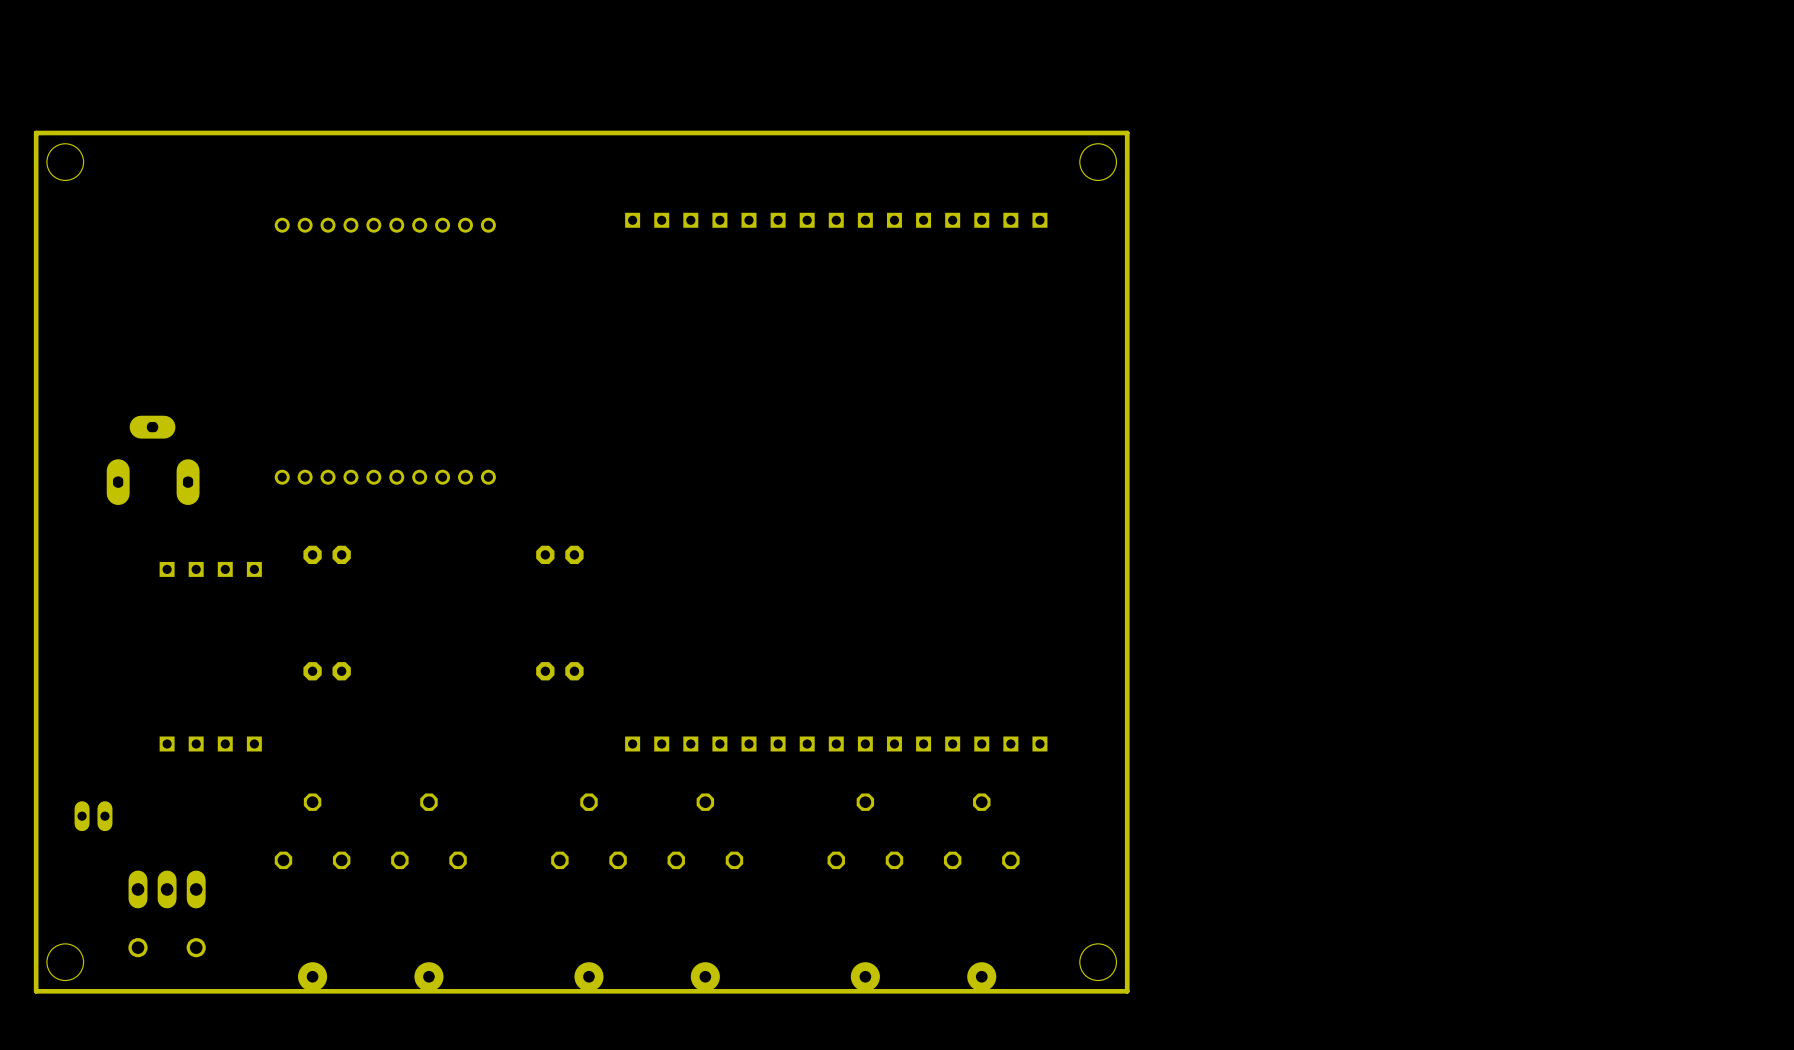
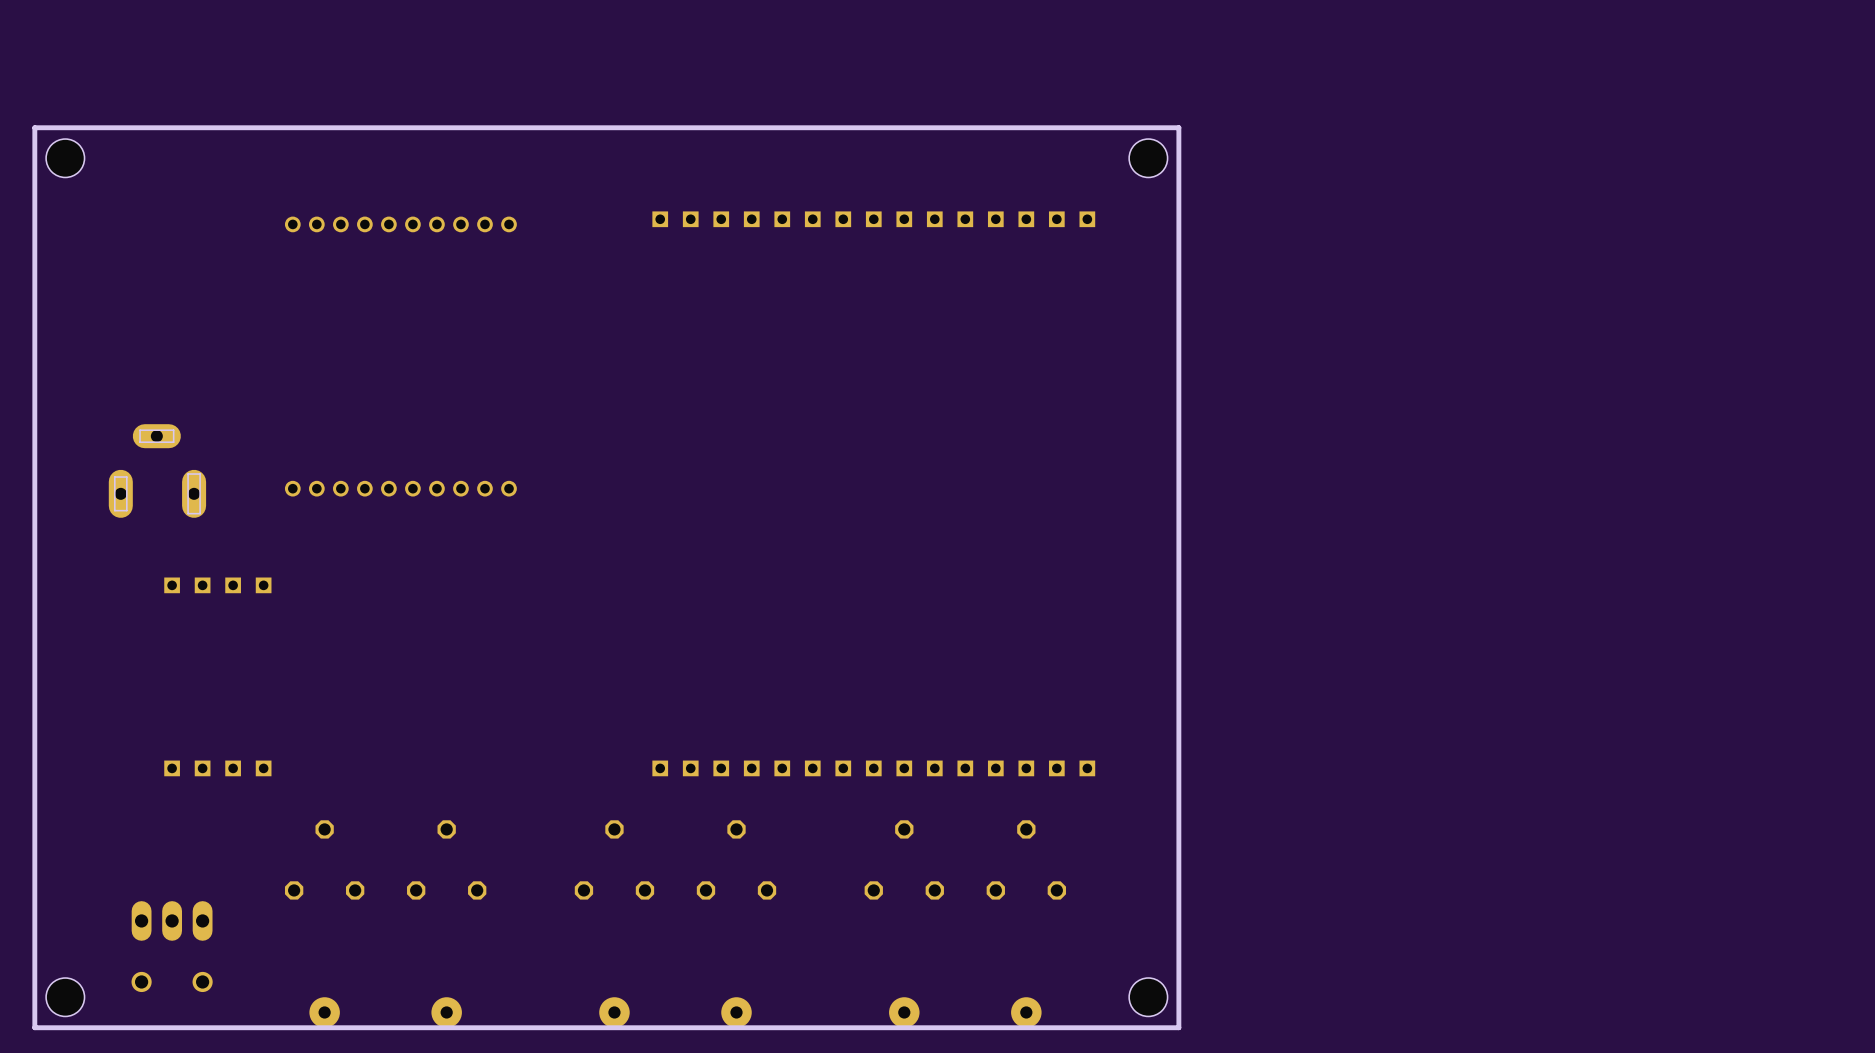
part: (327, 554) -> none
part: (559, 554) -> none
part: (327, 671) -> none
part: (559, 671) -> none
part: (93, 816) -> none

